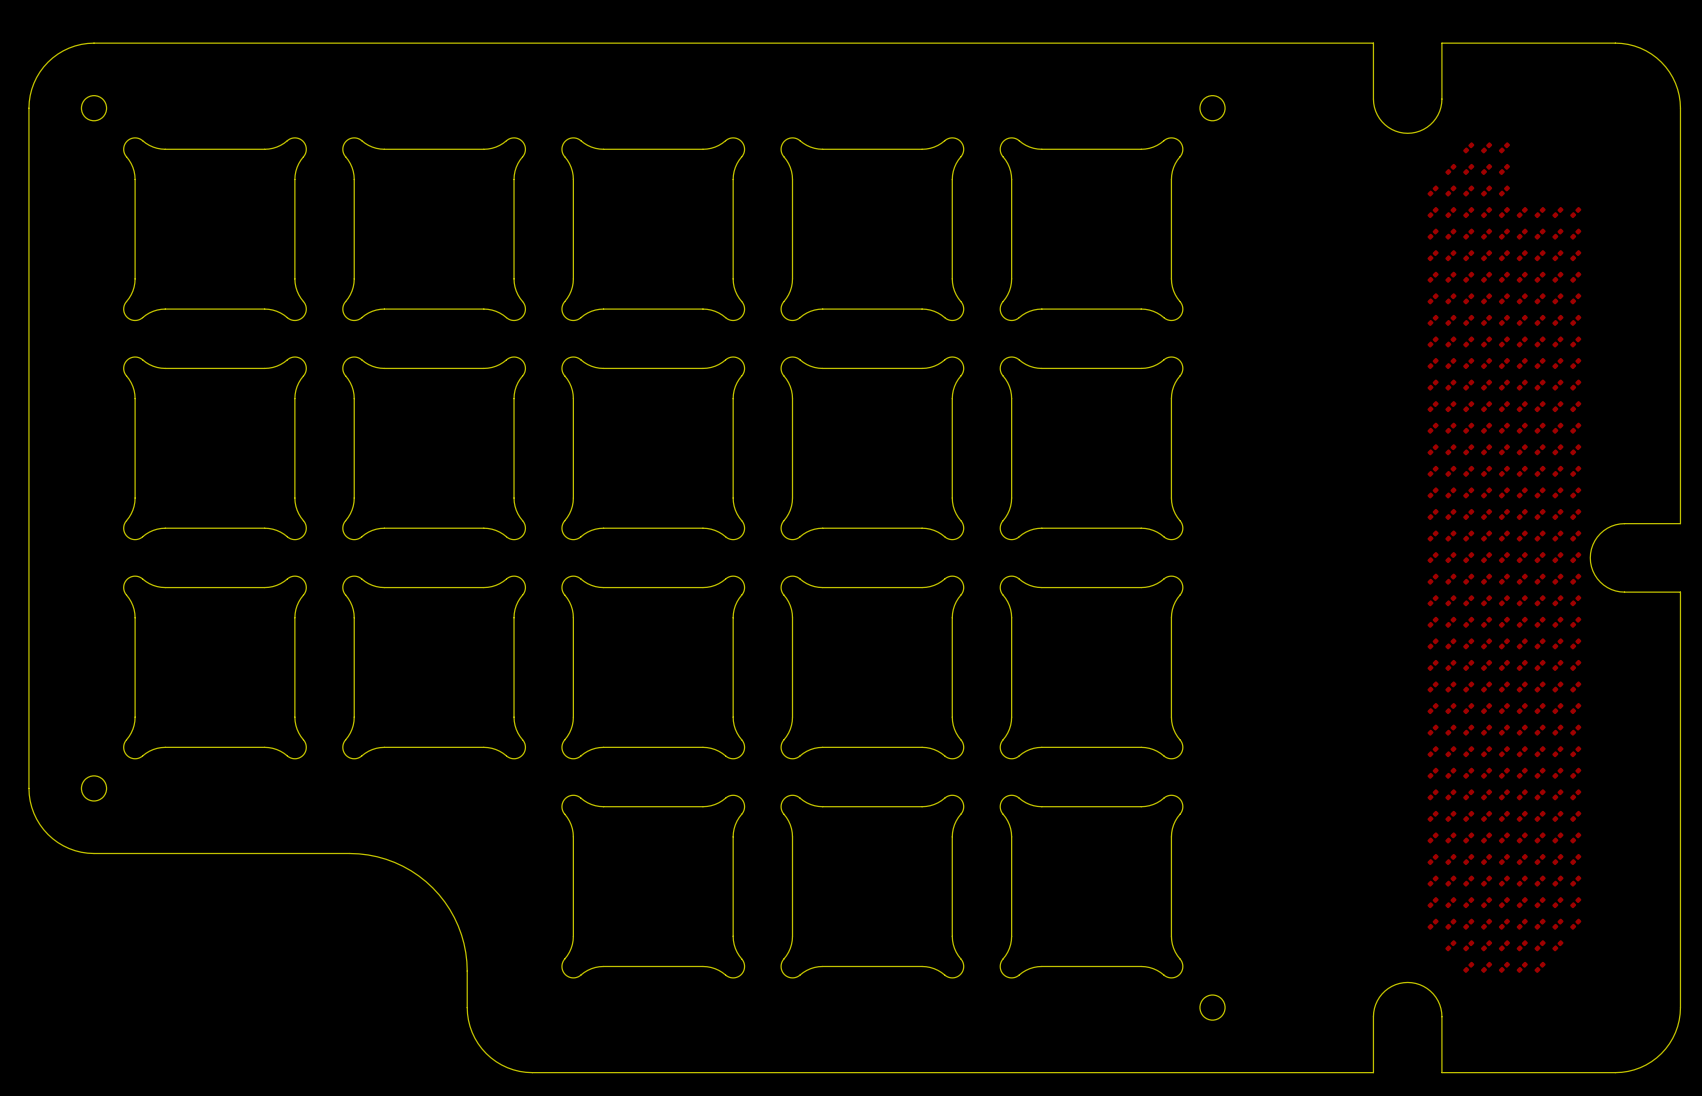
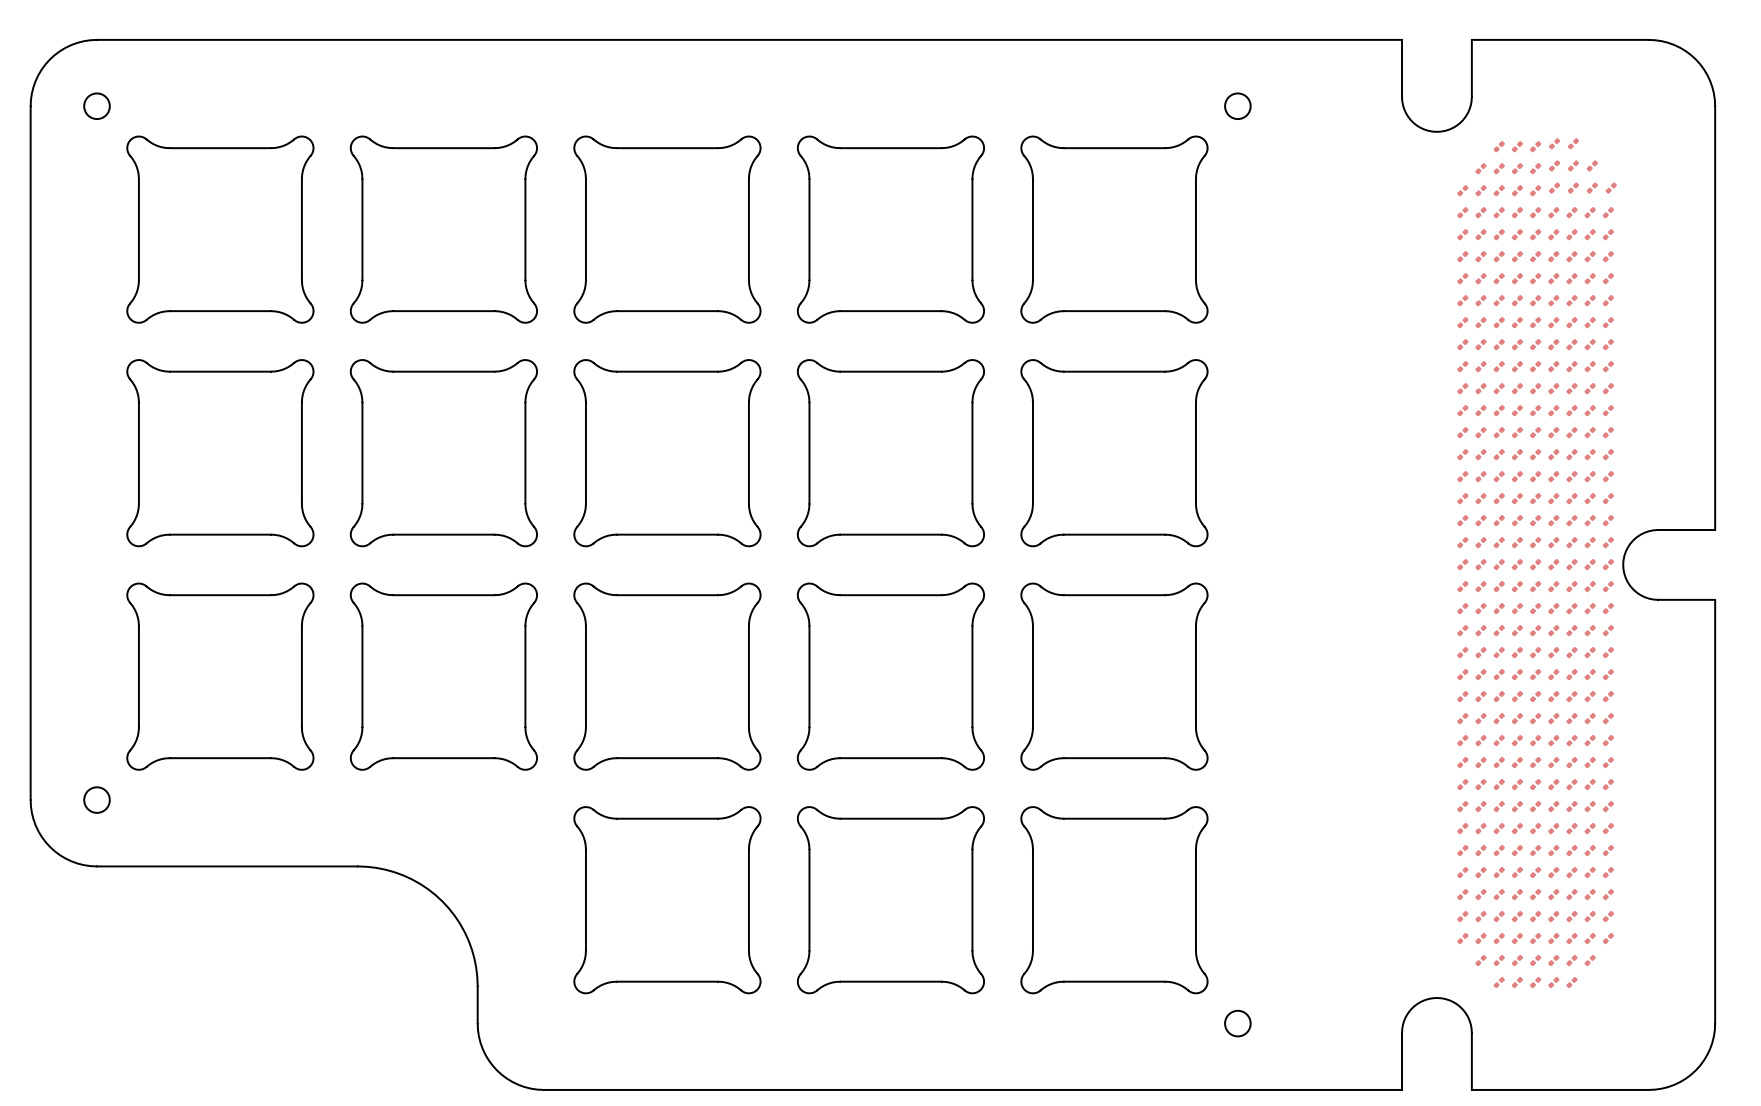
part: none -> (1554, 143)
part: none -> (1573, 143)
part: none -> (1554, 165)
part: none -> (1573, 165)
part: none -> (1592, 165)
part: none -> (1554, 188)
part: none -> (1573, 188)
part: none -> (1592, 188)
part: none -> (1611, 188)

